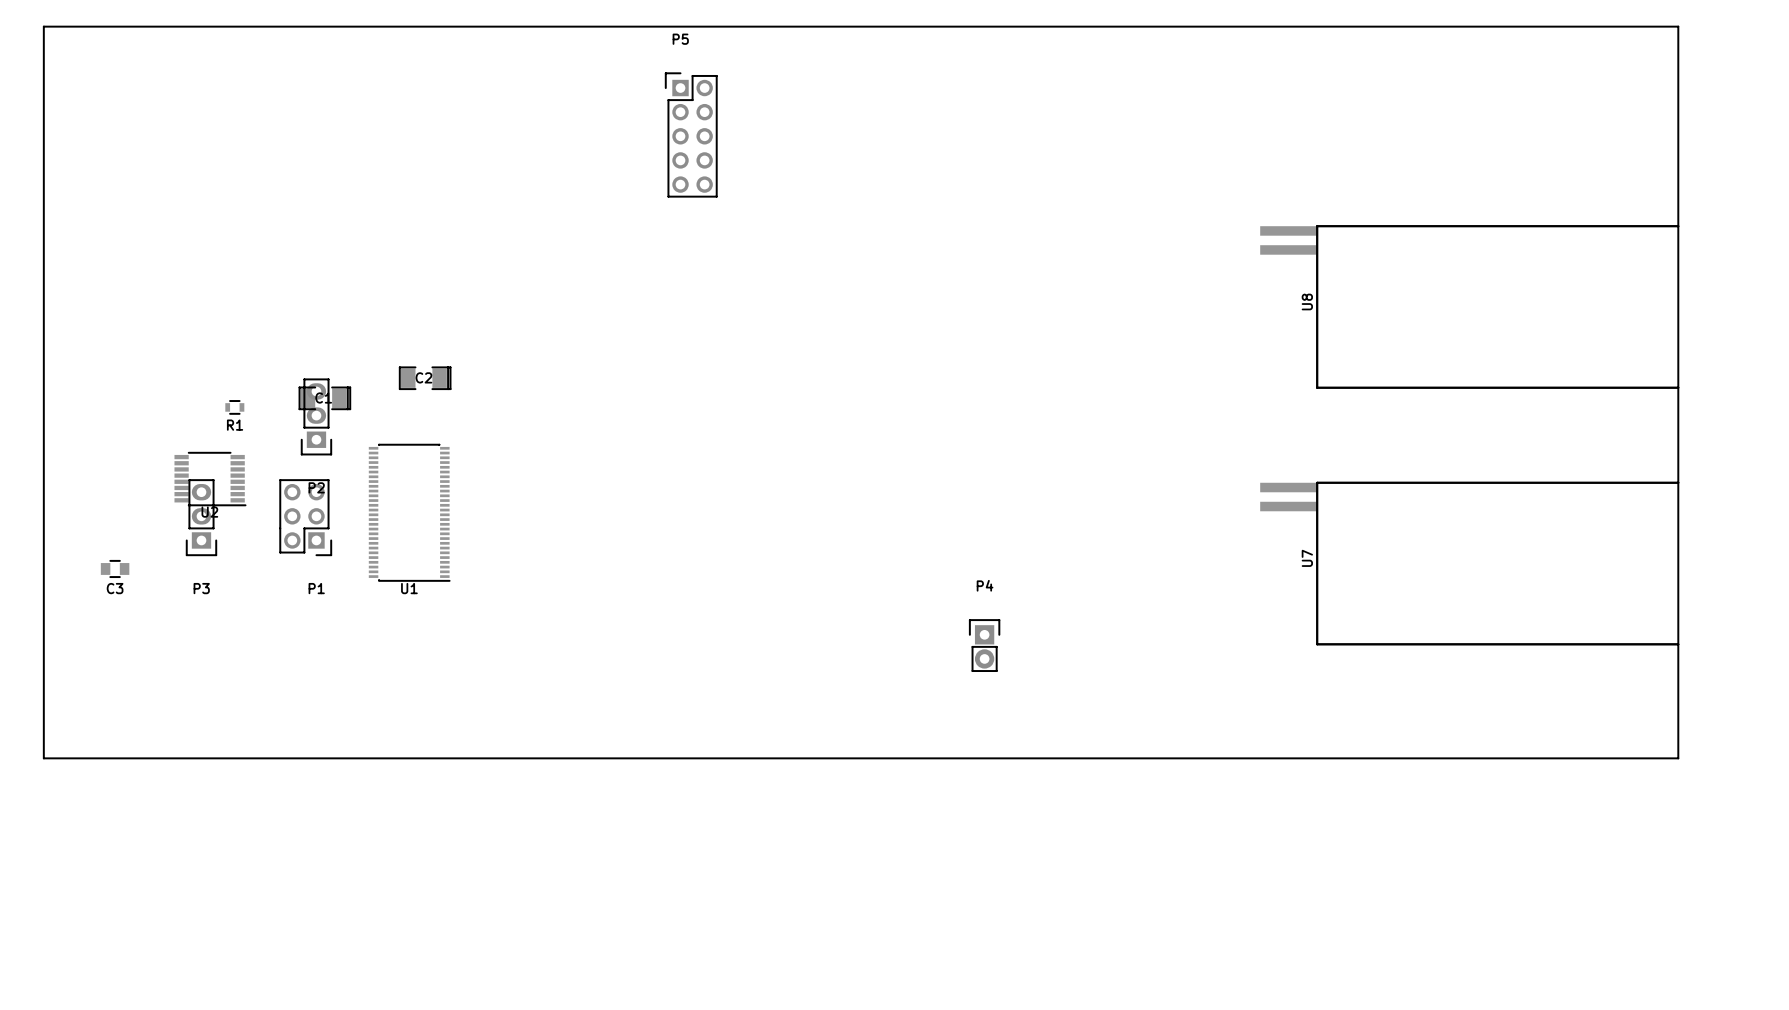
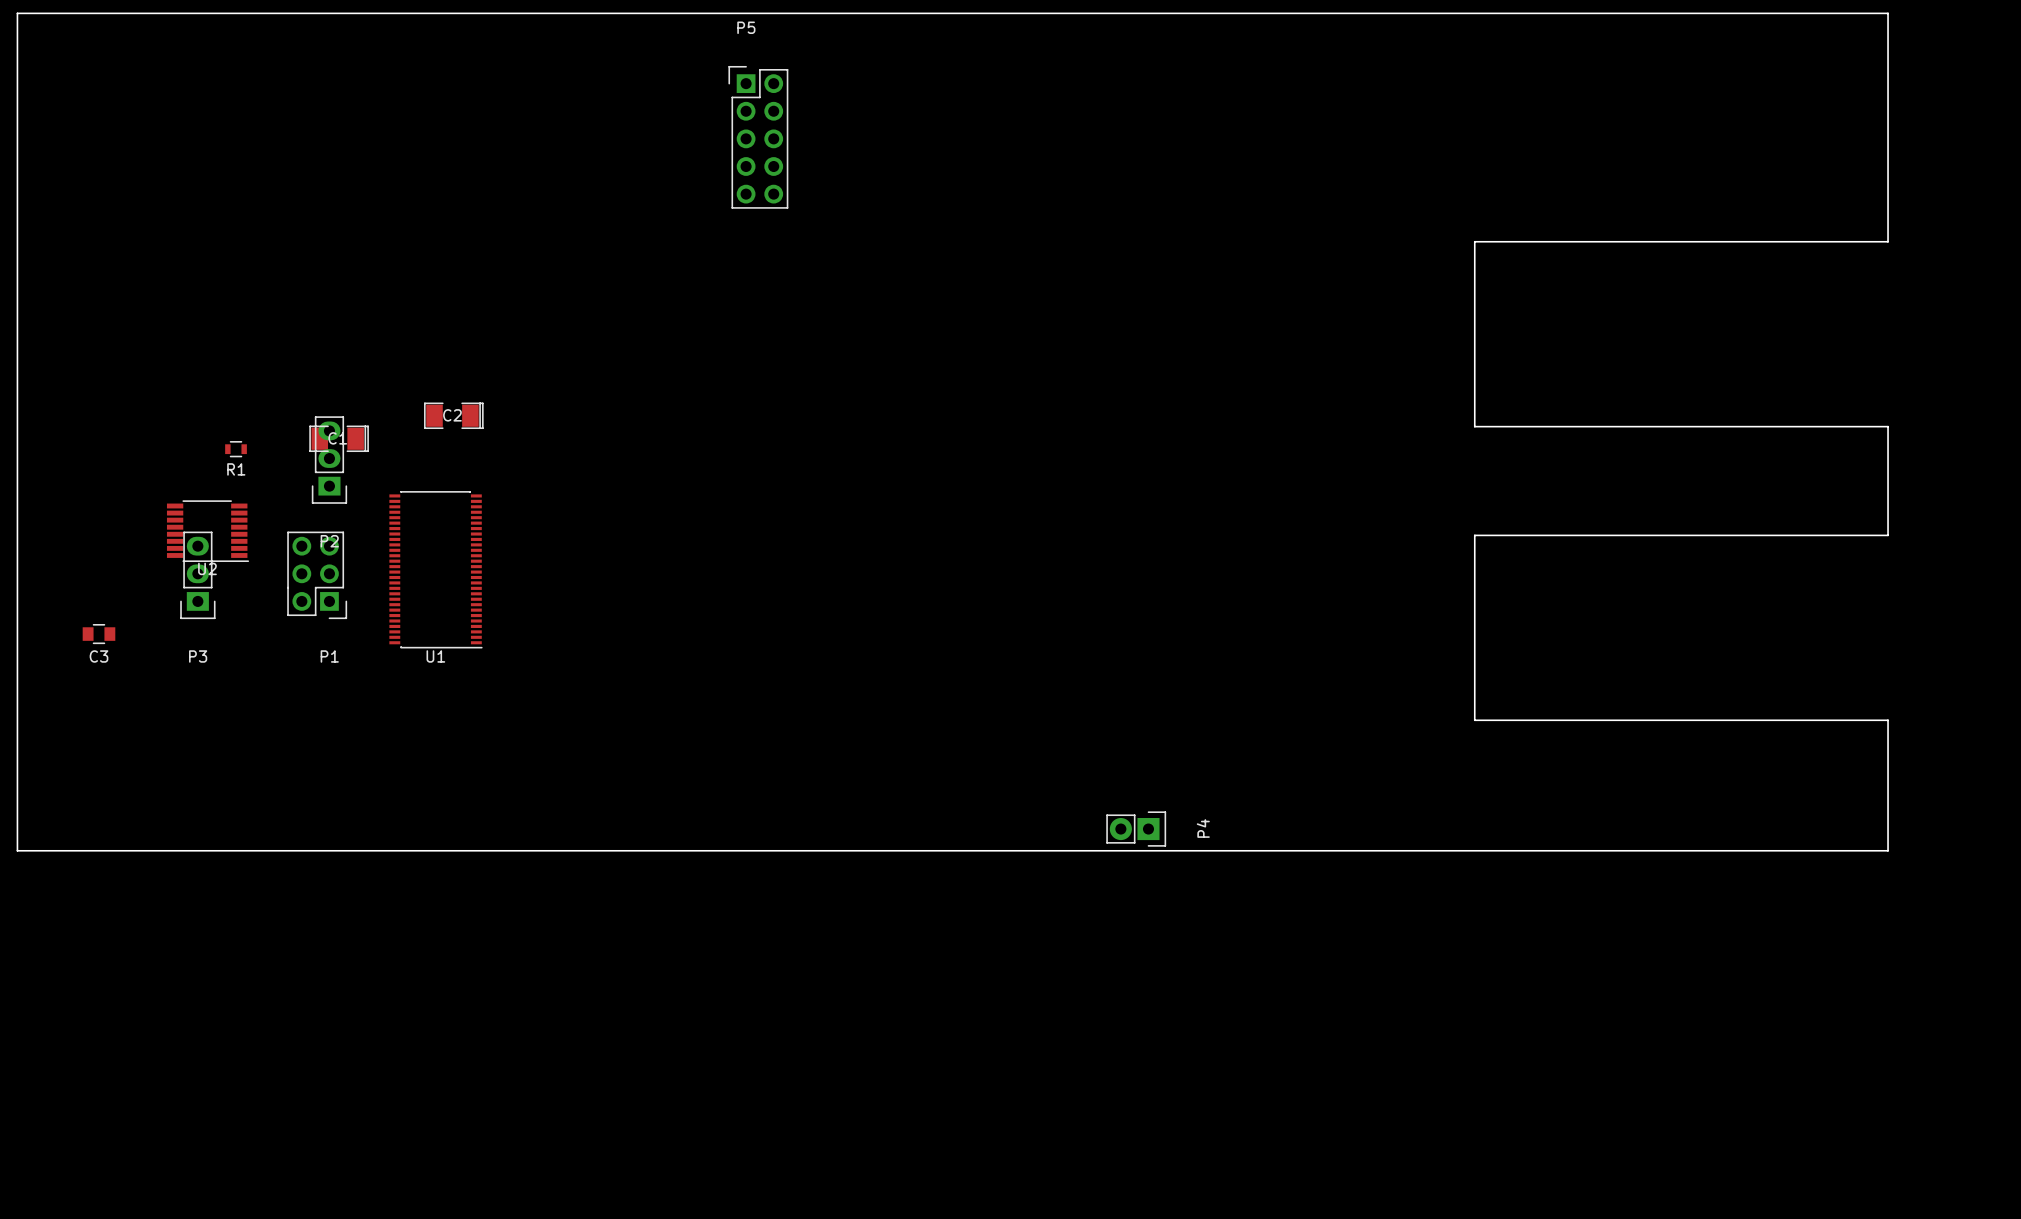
U8: (1469, 306) -> none
U7: (1469, 563) -> none
P4 rotation: 0° (984, 645) -> 90° clockwise (1136, 829)
P4 position: (984, 645) -> (1136, 829)

